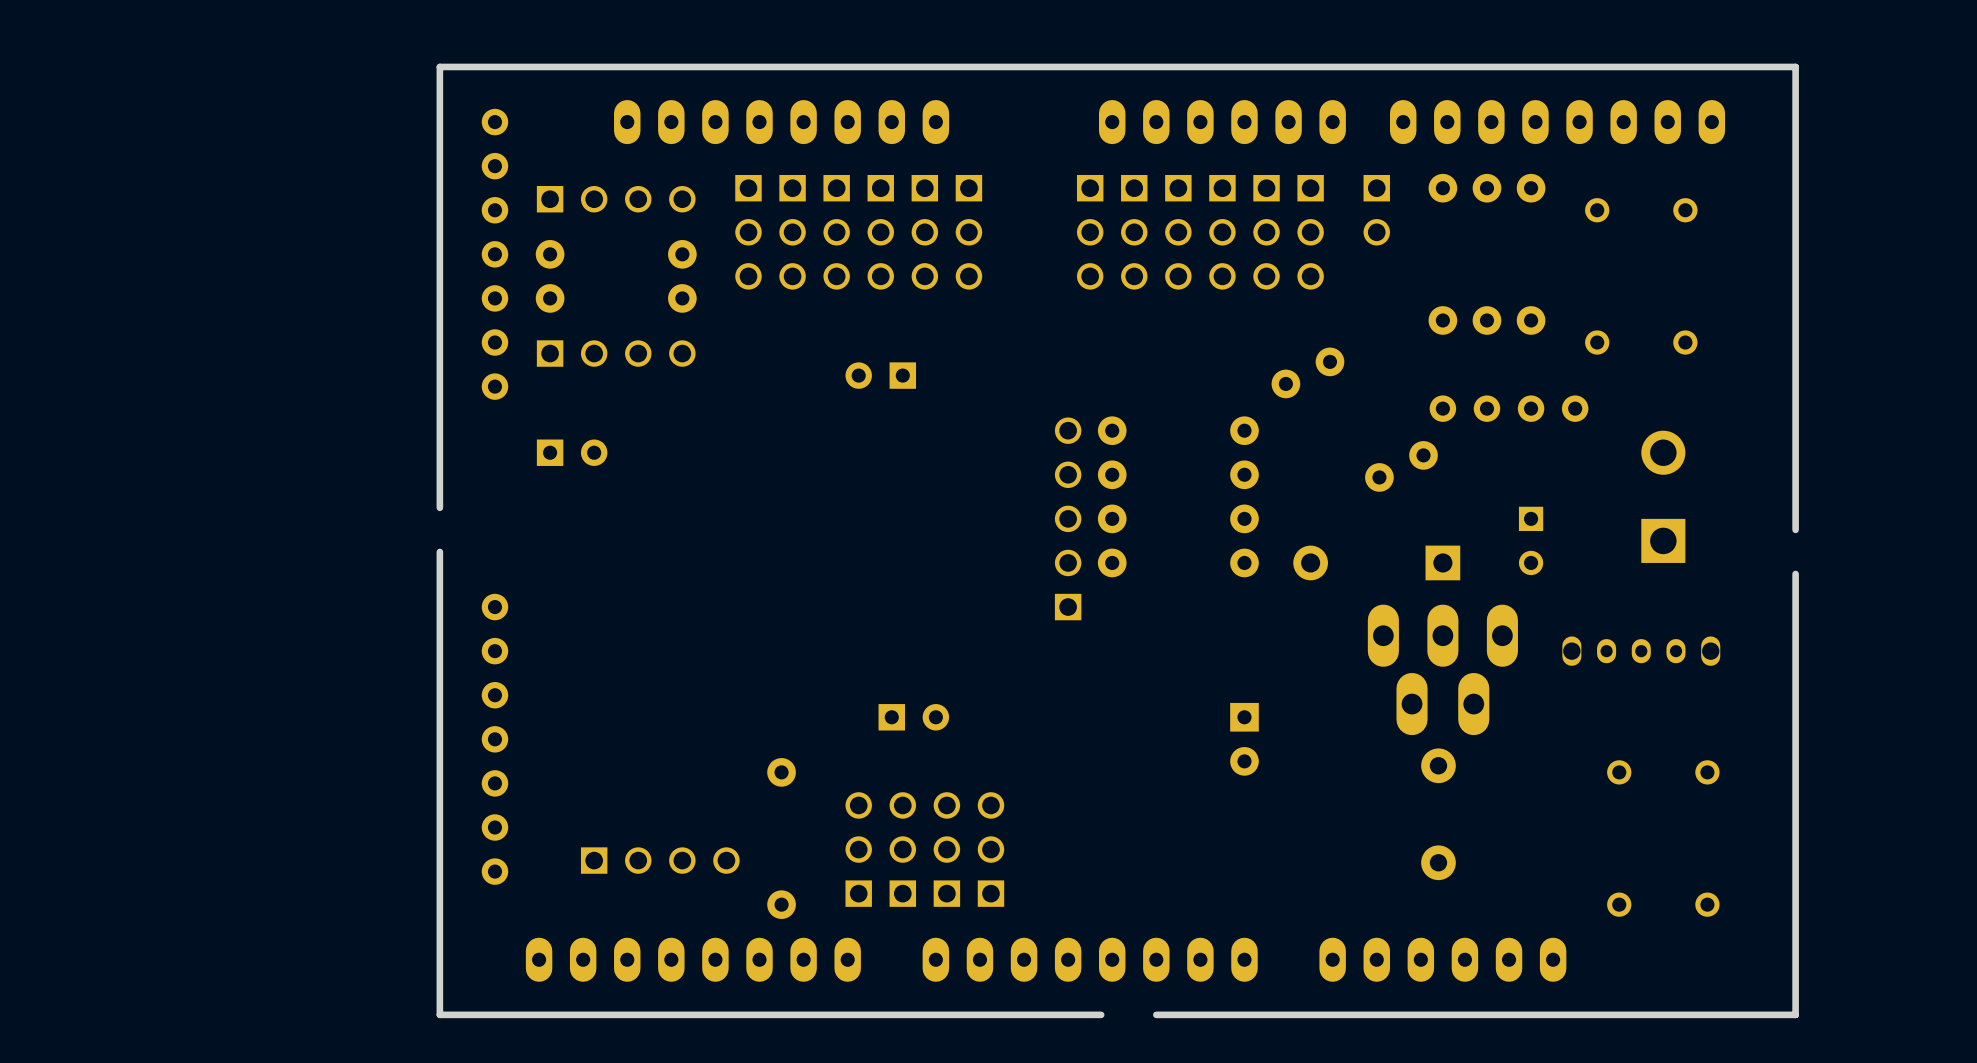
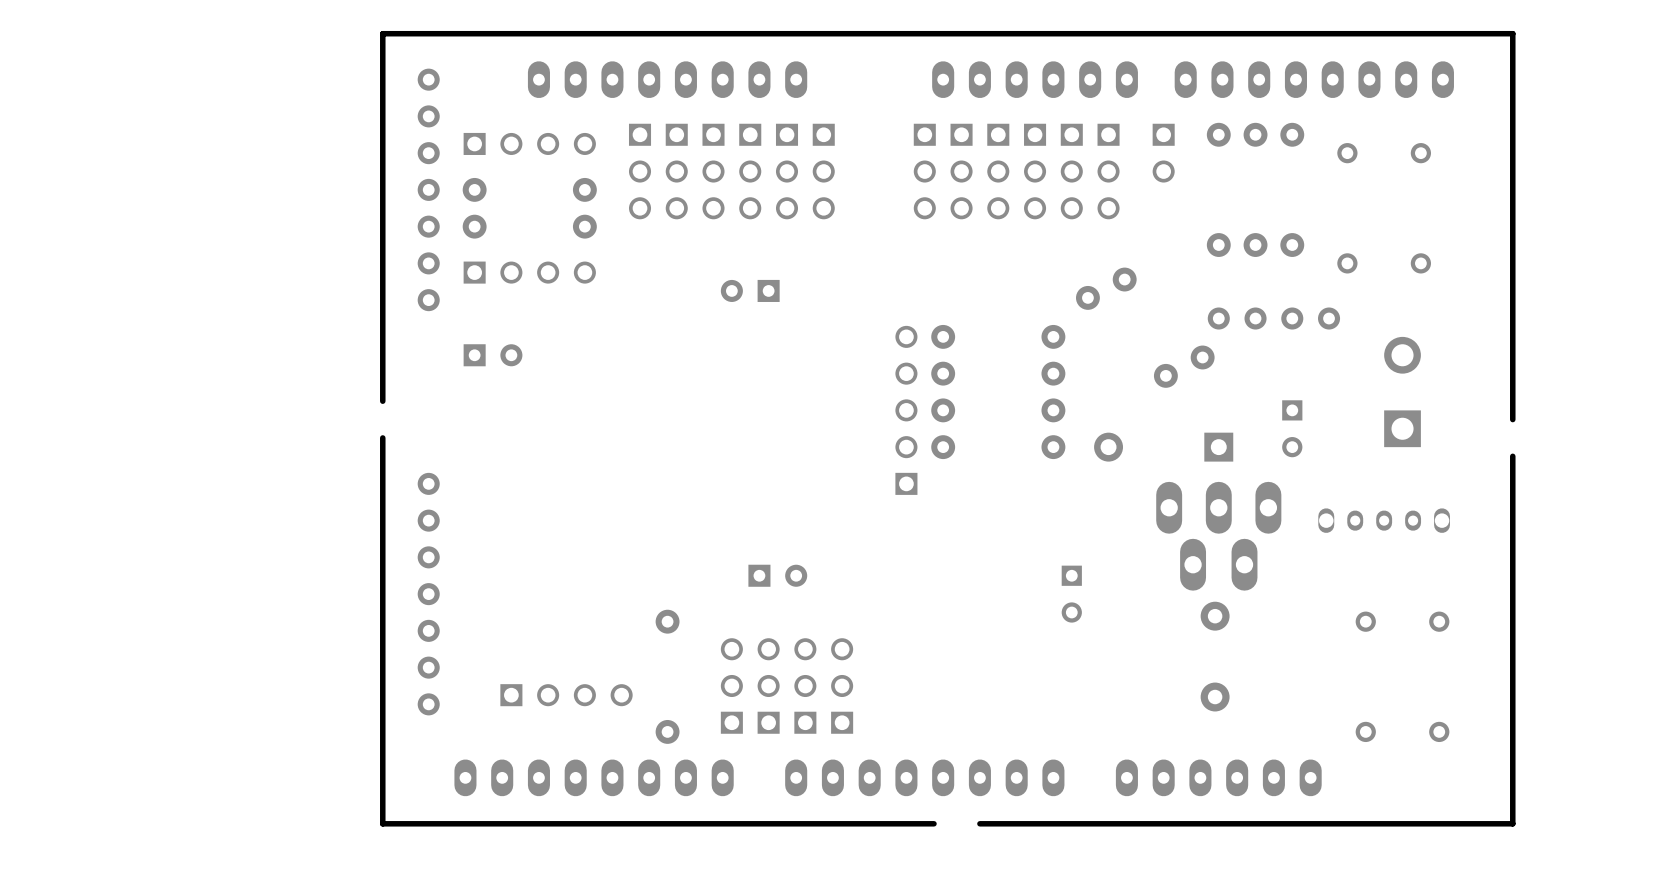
part: (1244, 739) -> none
part: none -> (1071, 594)

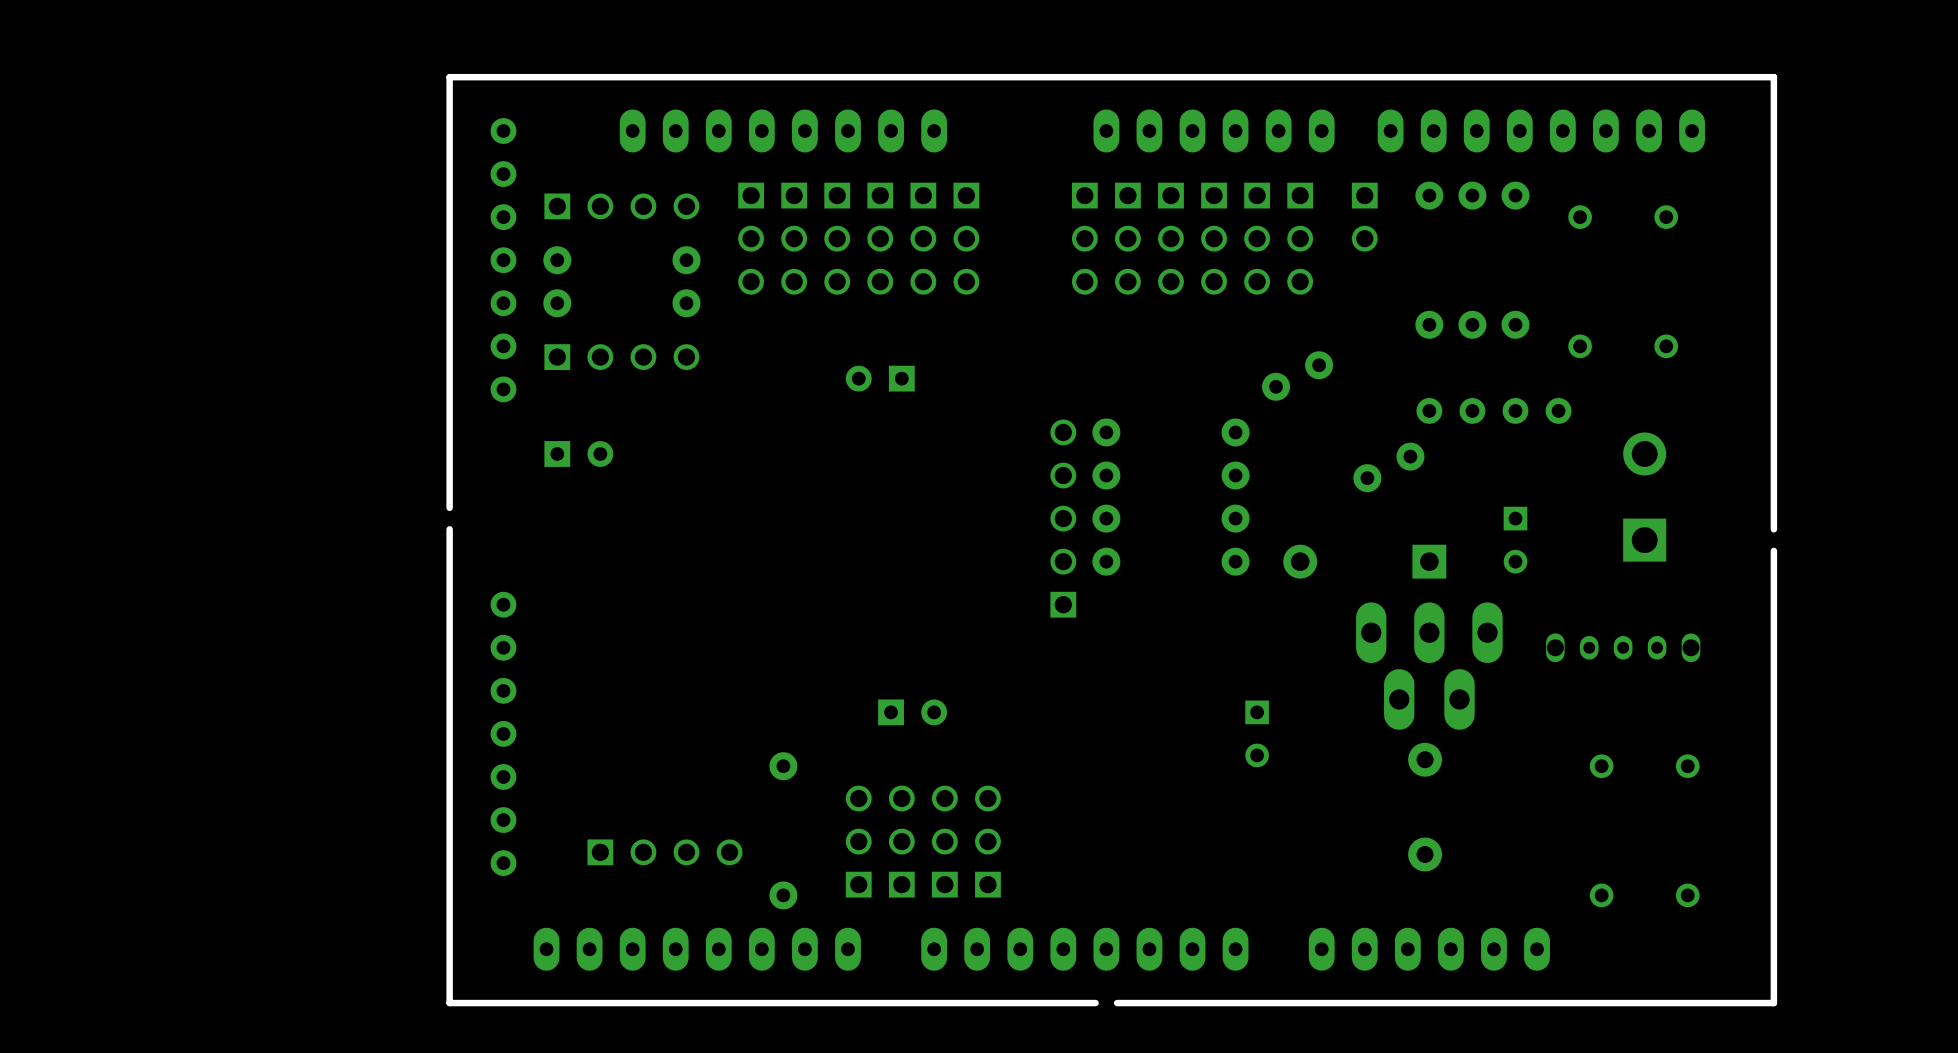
board edge: none -> (449, 529) (449, 550)
board edge: none -> (1773, 550) (1773, 572)
board edge: none -> (1149, 1003) (1117, 1003)

